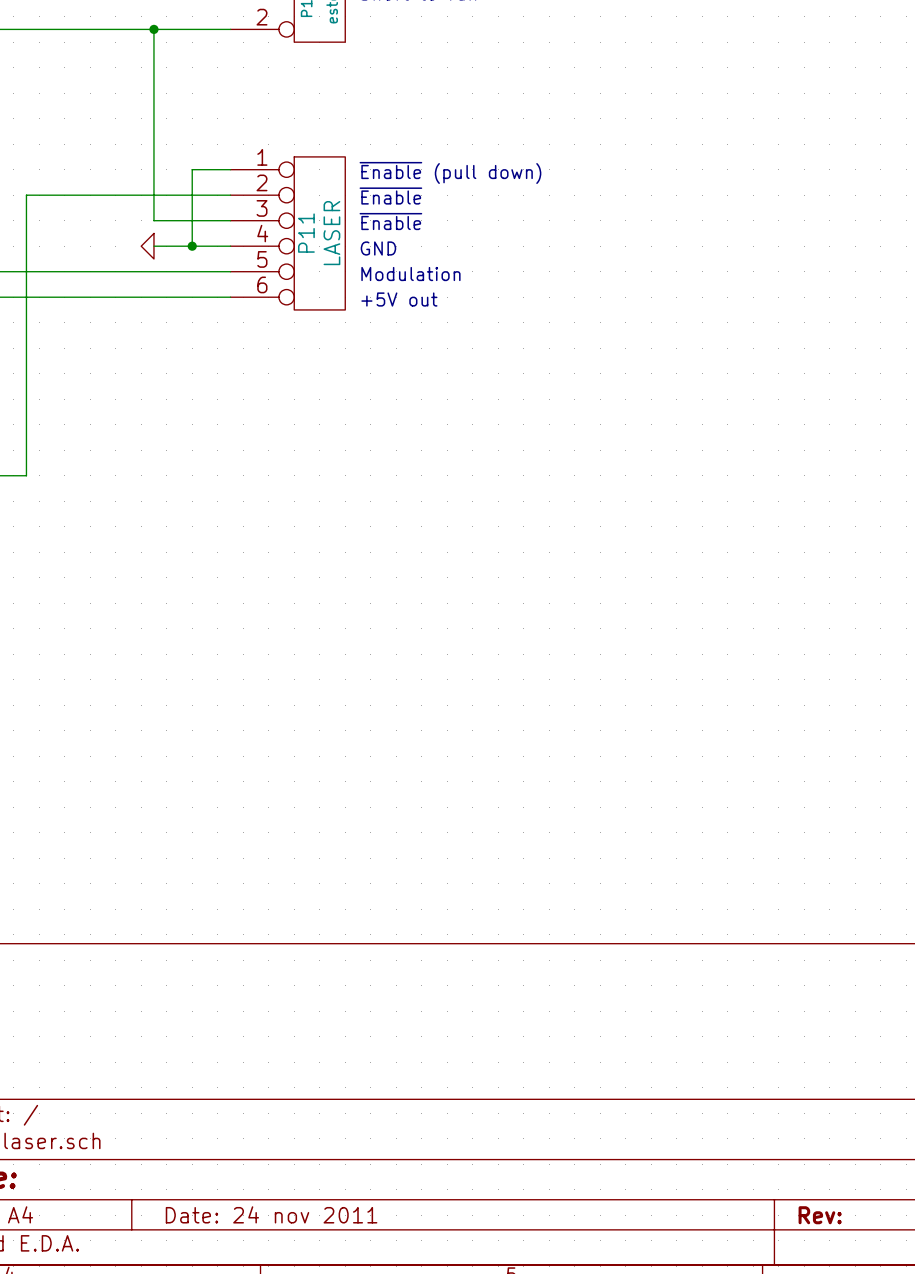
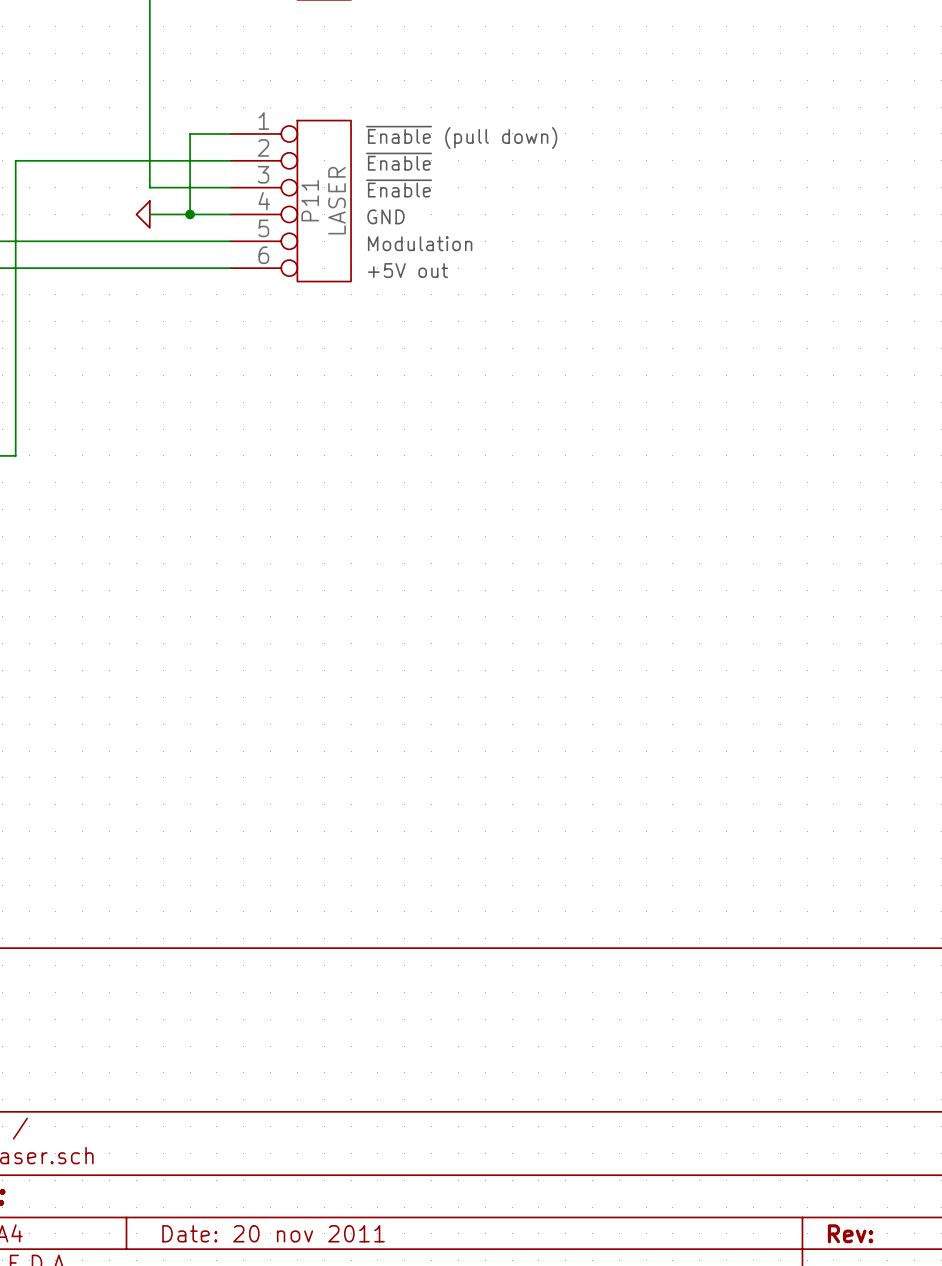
title block: Date: 24 nov 2011 (271, 1214) -> Date: 20 nov 2011 (273, 1233)

